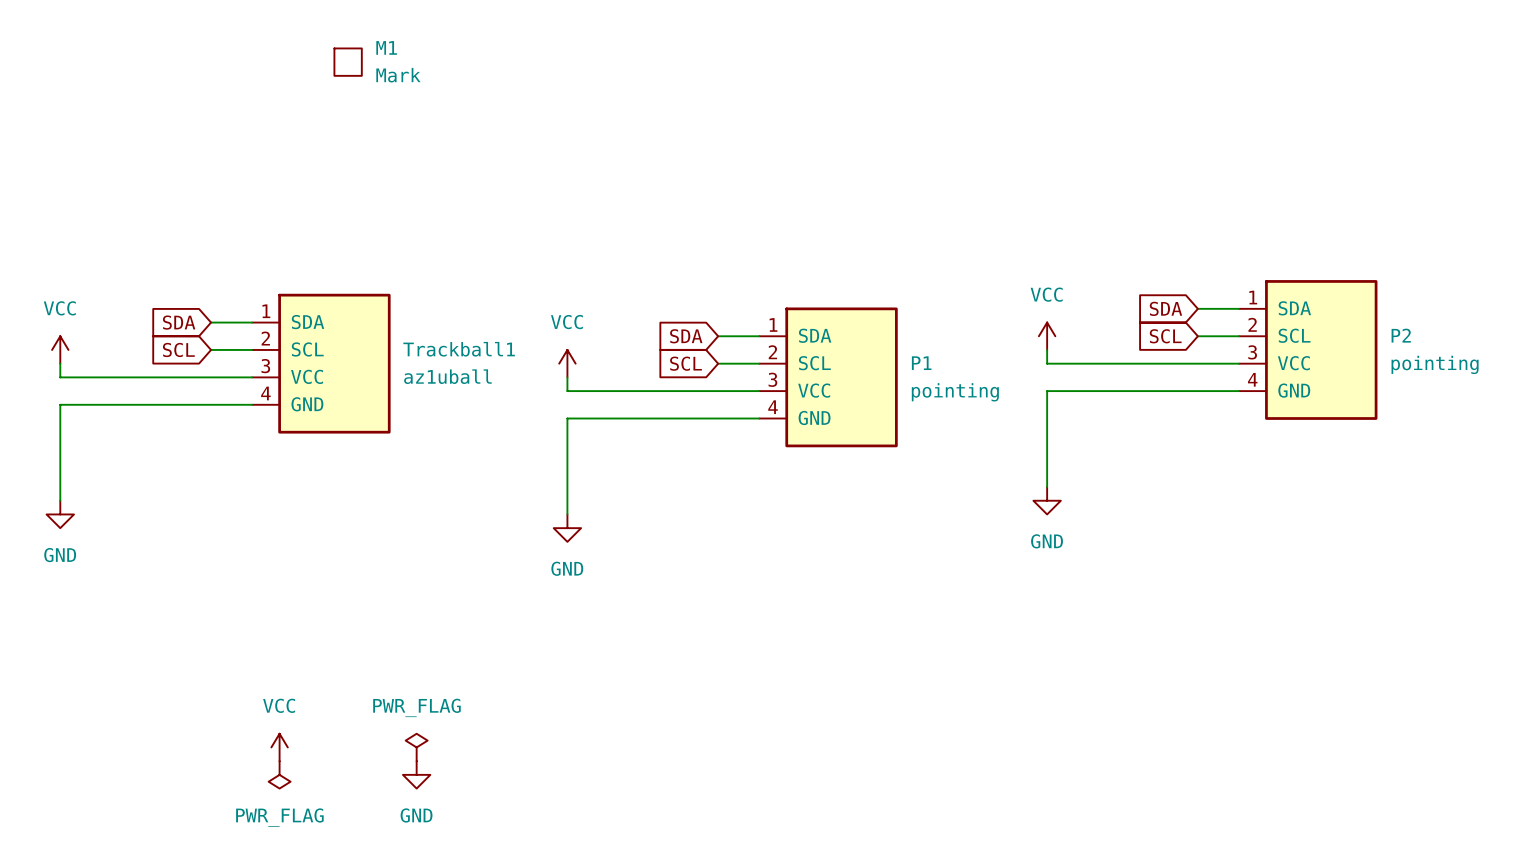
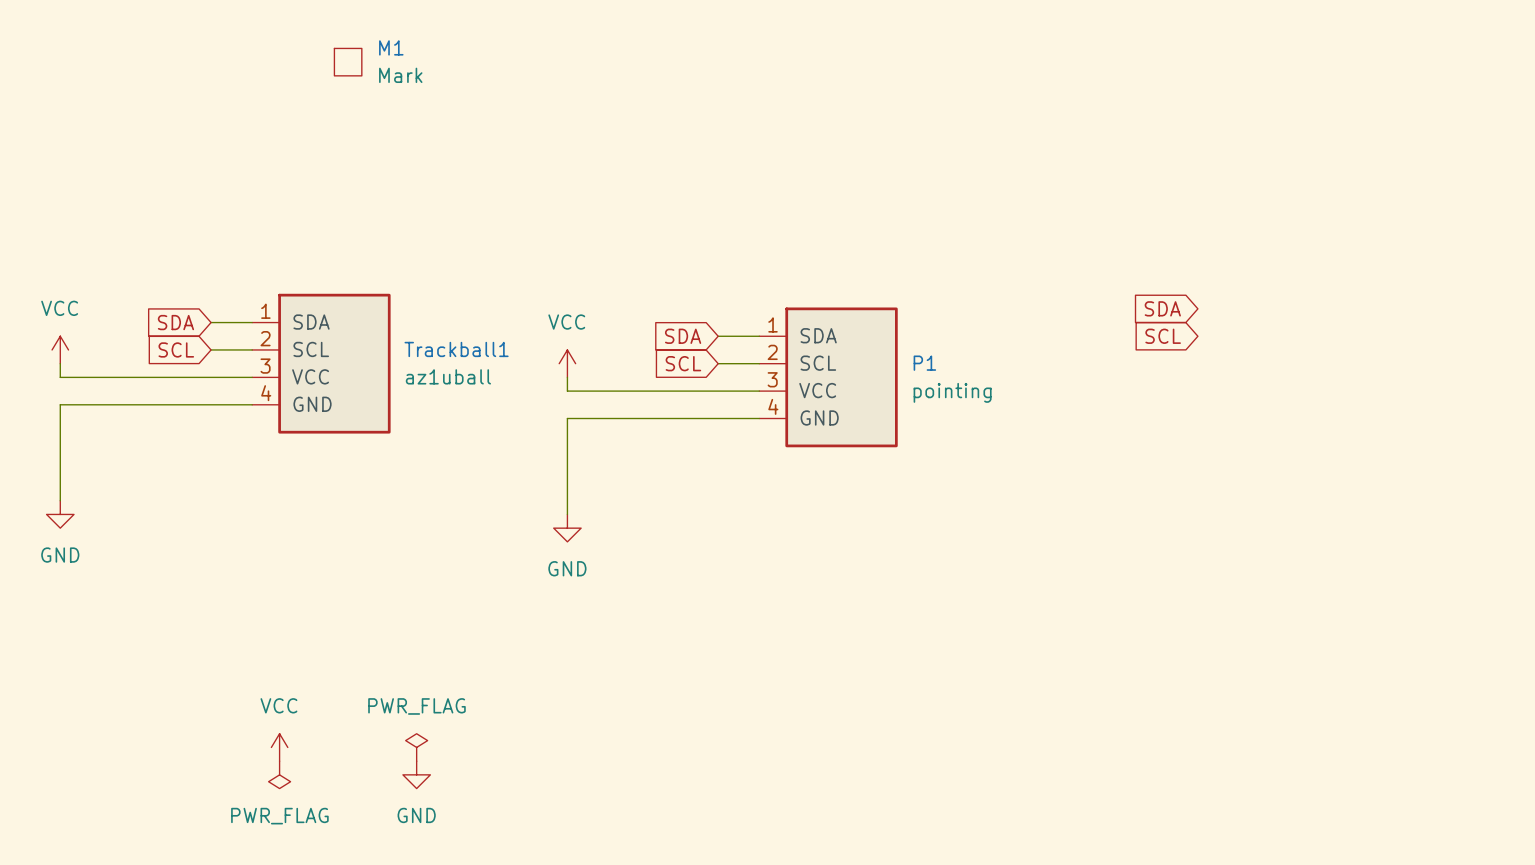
wire: (1197, 308) (1239, 308) -> none
power symbol: VCC (1047, 336) -> none
wire: (1197, 336) (1239, 336) -> none
wire: (1047, 349) (1047, 363) (1239, 363) -> none
P2: pointing (1308, 349) -> none
wire: (1239, 391) (1047, 391) (1047, 487) -> none
power symbol: GND (1047, 500) -> none

